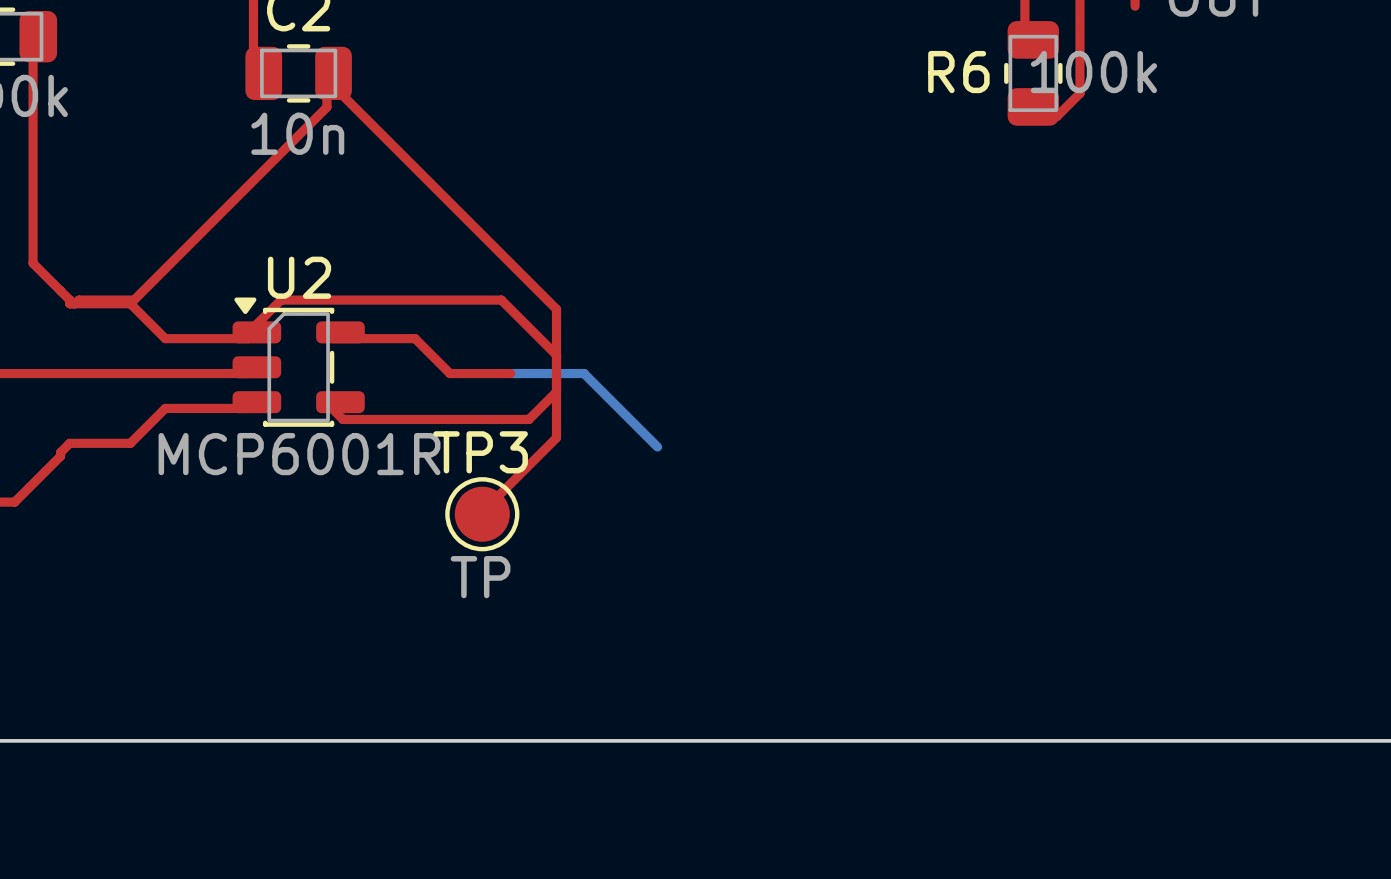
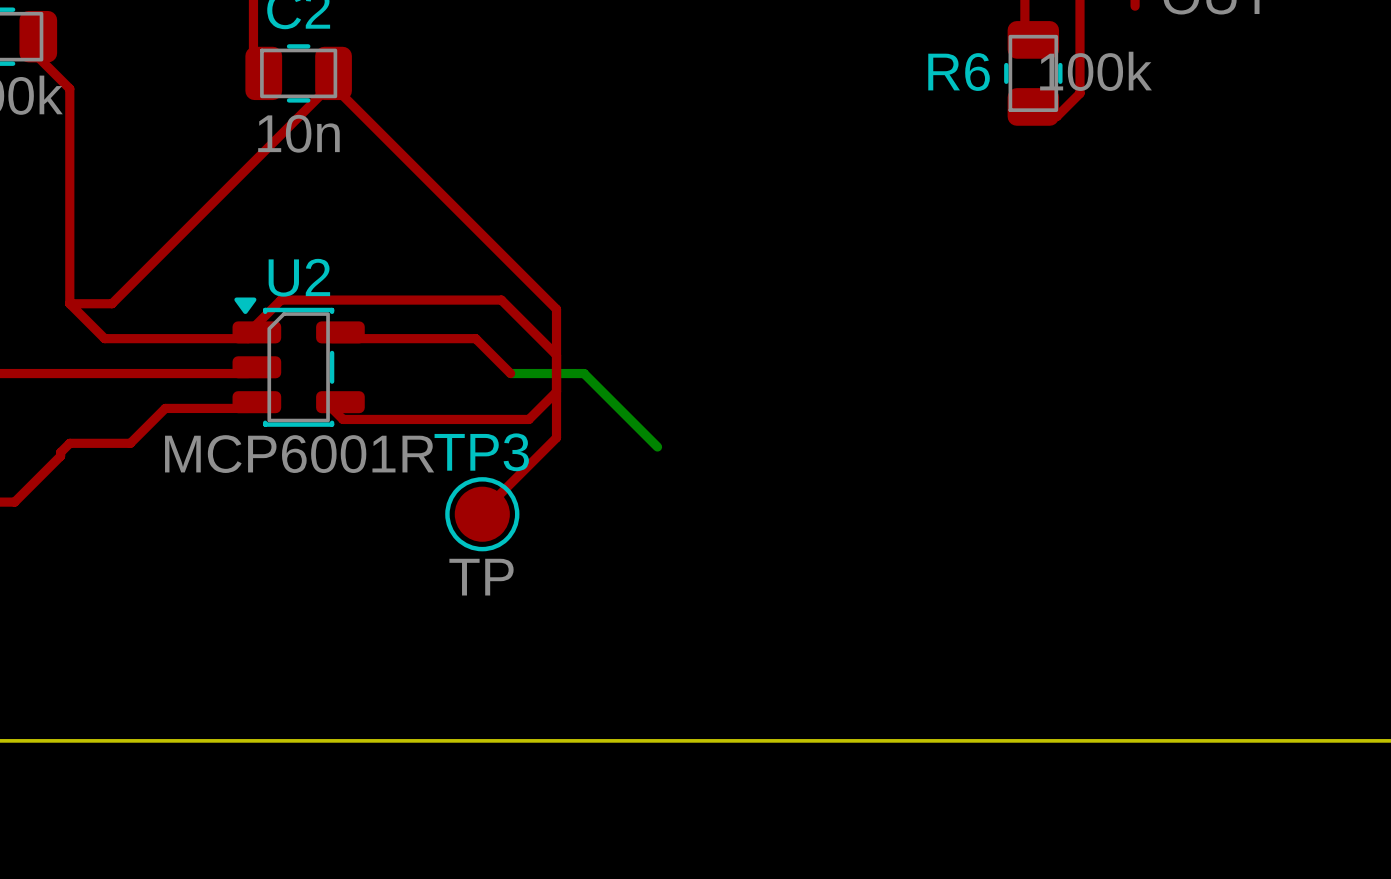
top track: (33, 52) (33, 263) (69, 300) -> (33, 52) (69, 88) (69, 300)
top track: (326, 88) (326, 107) (134, 300) (78, 300) (75, 303) -> (326, 88) (112, 303)
top track: (112, 303) (130, 303) (165, 338) -> (69, 303) (104, 338) (165, 338)
top track: (415, 338) (449, 373) (510, 373) -> (415, 338) (475, 338) (510, 373)

